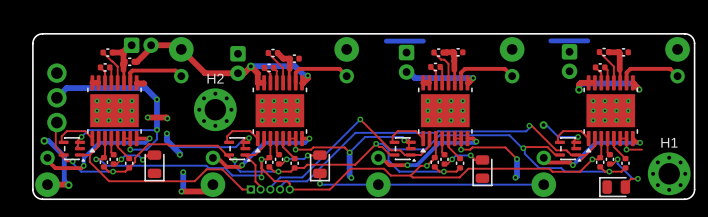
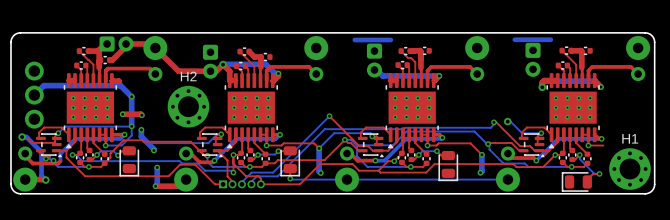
top track: (56, 122) (55, 147) (63, 154) -> none
top track: none -> (27, 137) (32, 142) (53, 142)
via: (72, 161) -> none
via: none -> (46, 158)
via: none -> (53, 160)
via: (83, 165) -> none

